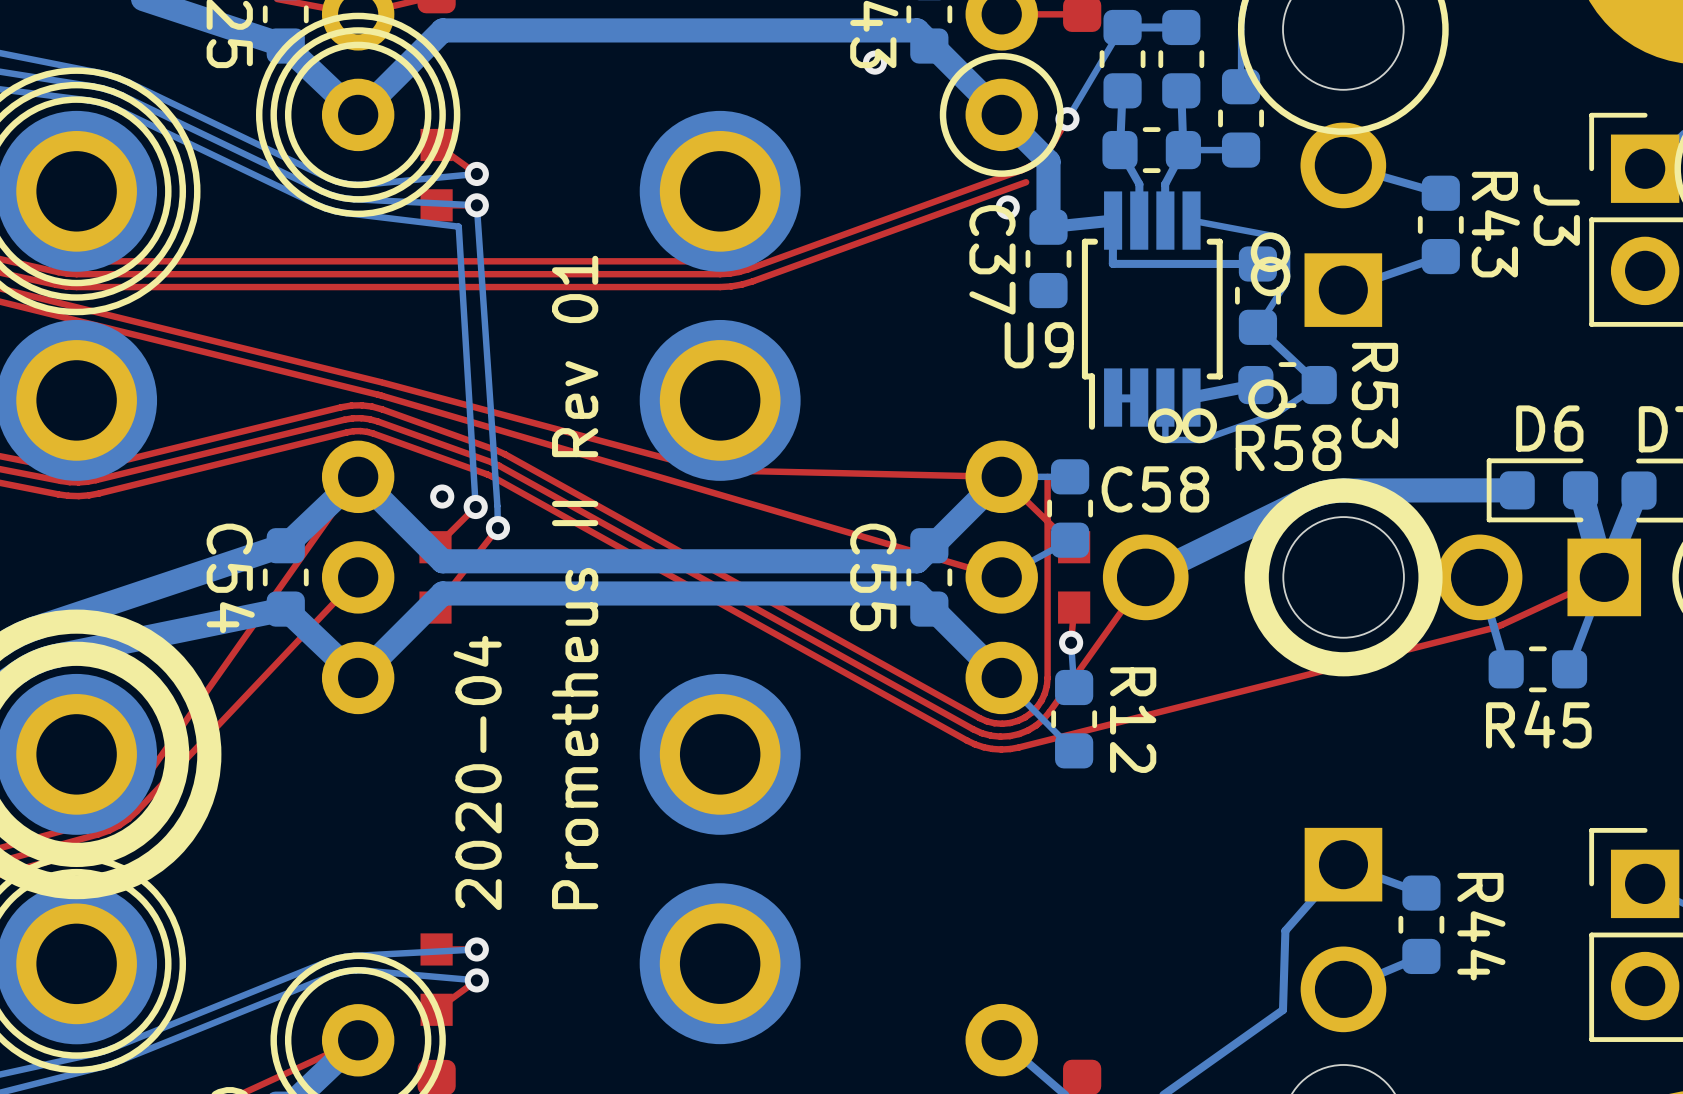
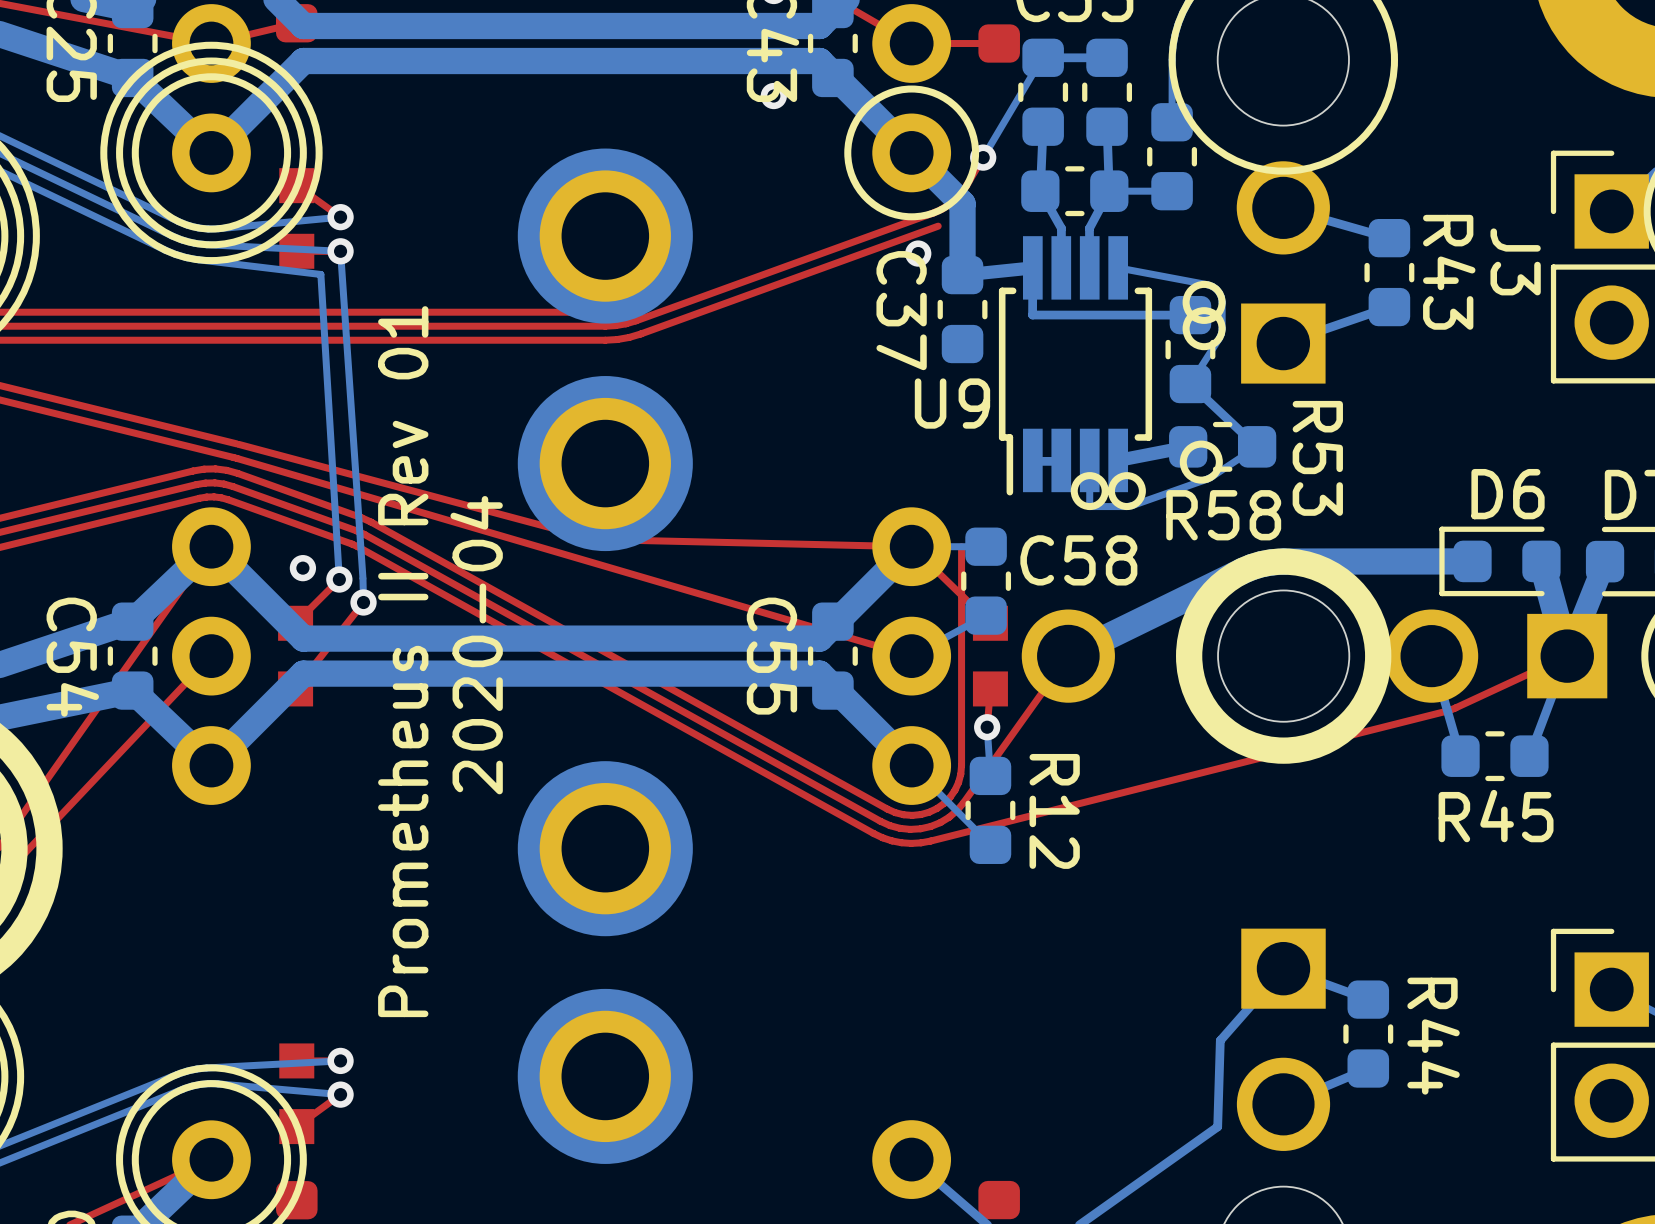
text position: Prometheus II Rev 01 (575, 582) -> Prometheus II Rev 01 (403, 661)
text position: 2020-04 (477, 772) -> 2020-04 (476, 645)

